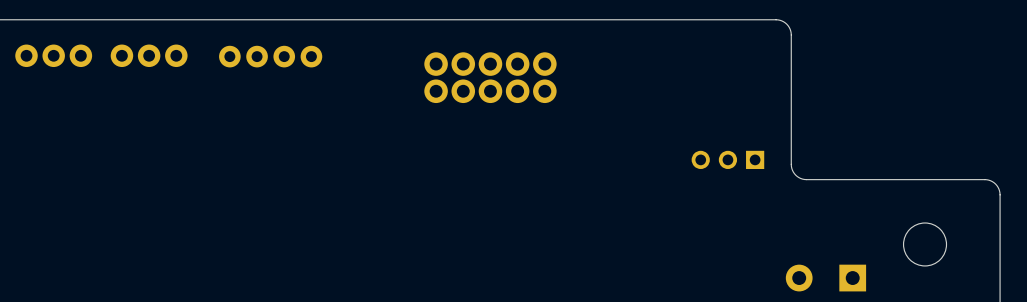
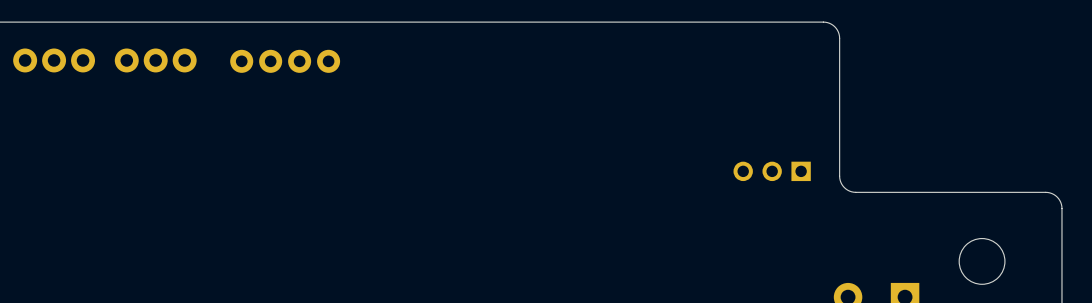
part: (490, 77) -> none

